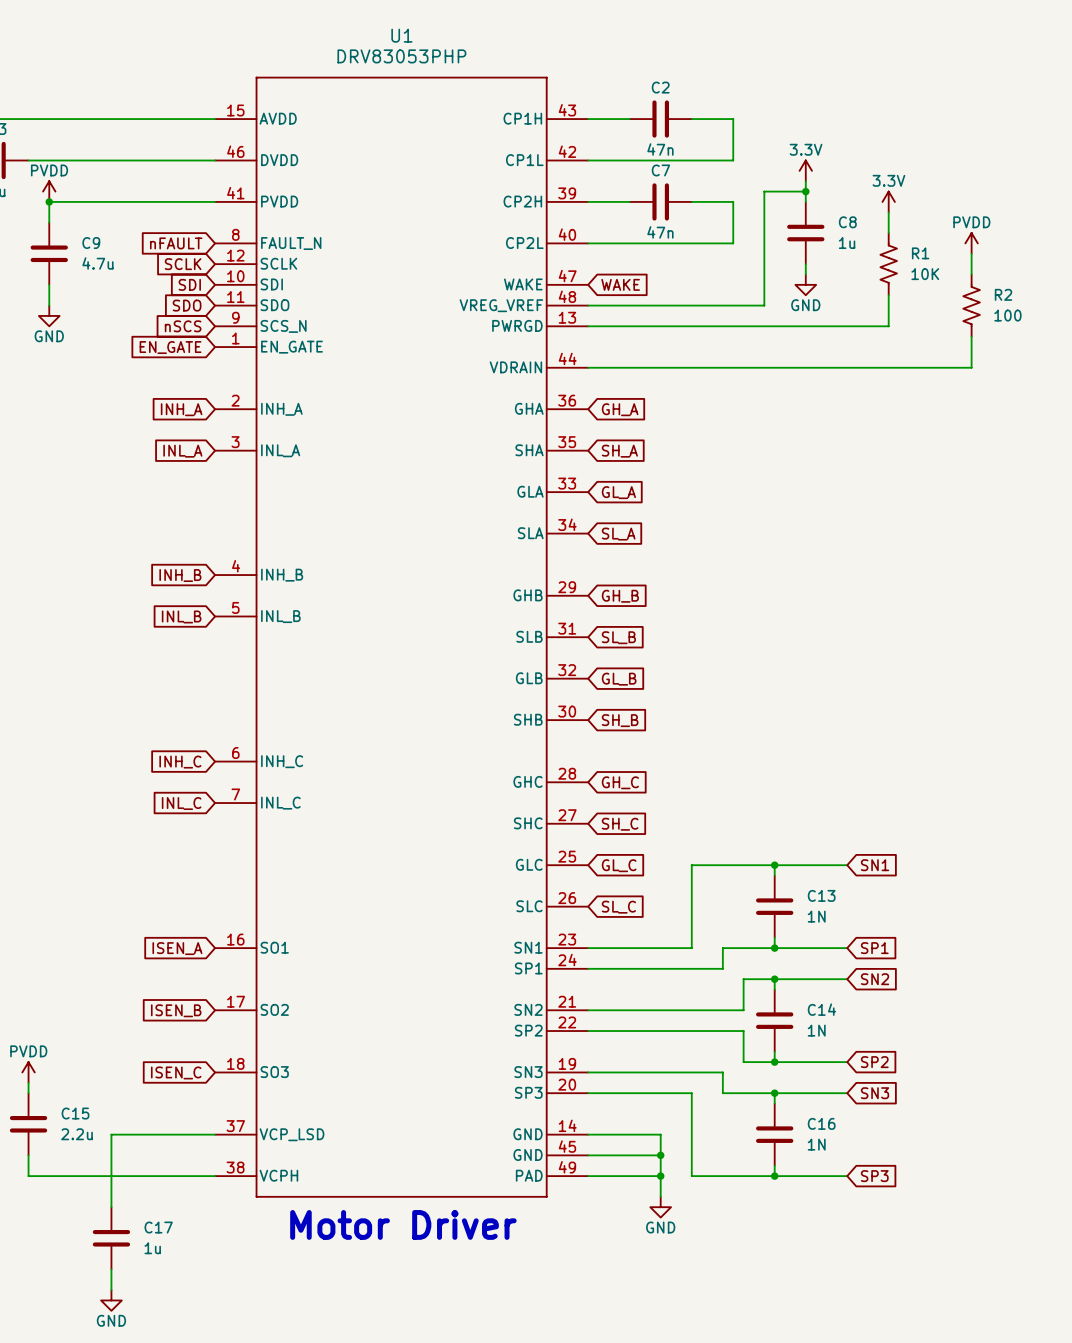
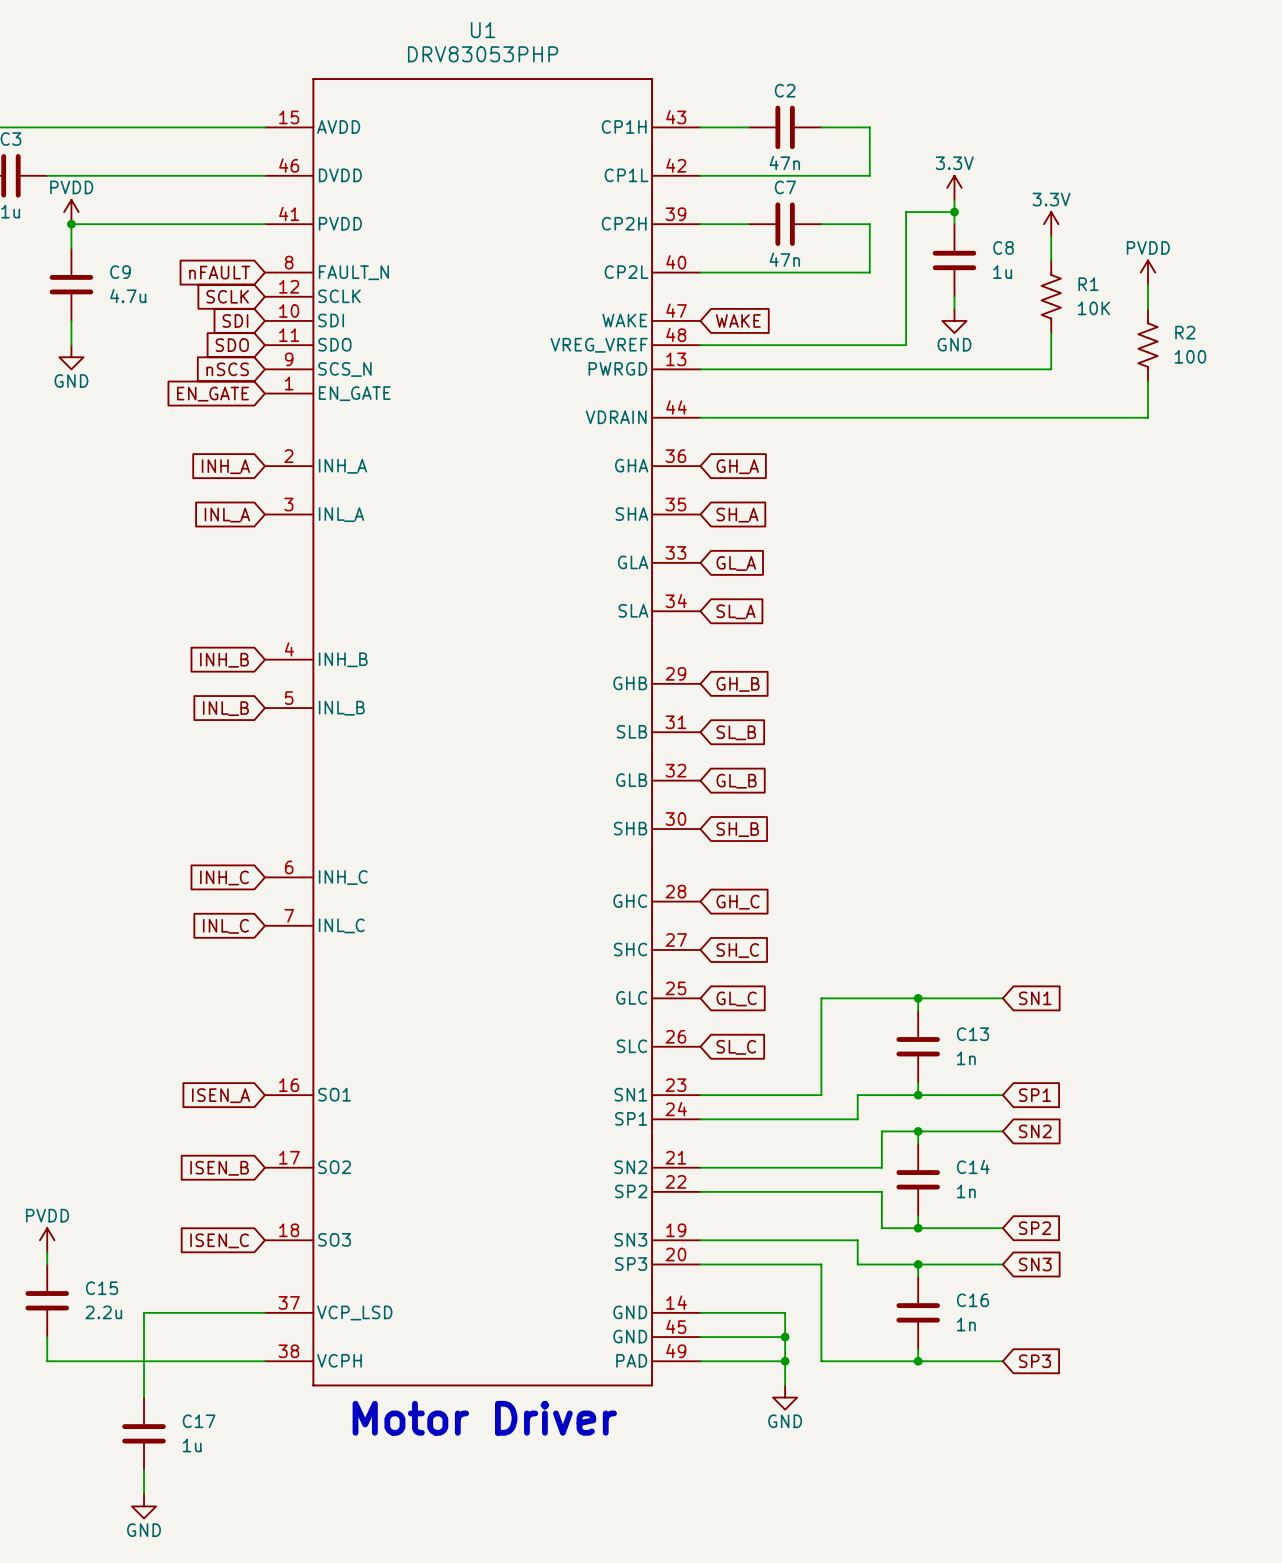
C13 value: 1N (816, 916) -> 1n (966, 1058)
C14 value: 1N (816, 1030) -> 1n (966, 1191)
C16 value: 1N (816, 1144) -> 1n (966, 1324)

